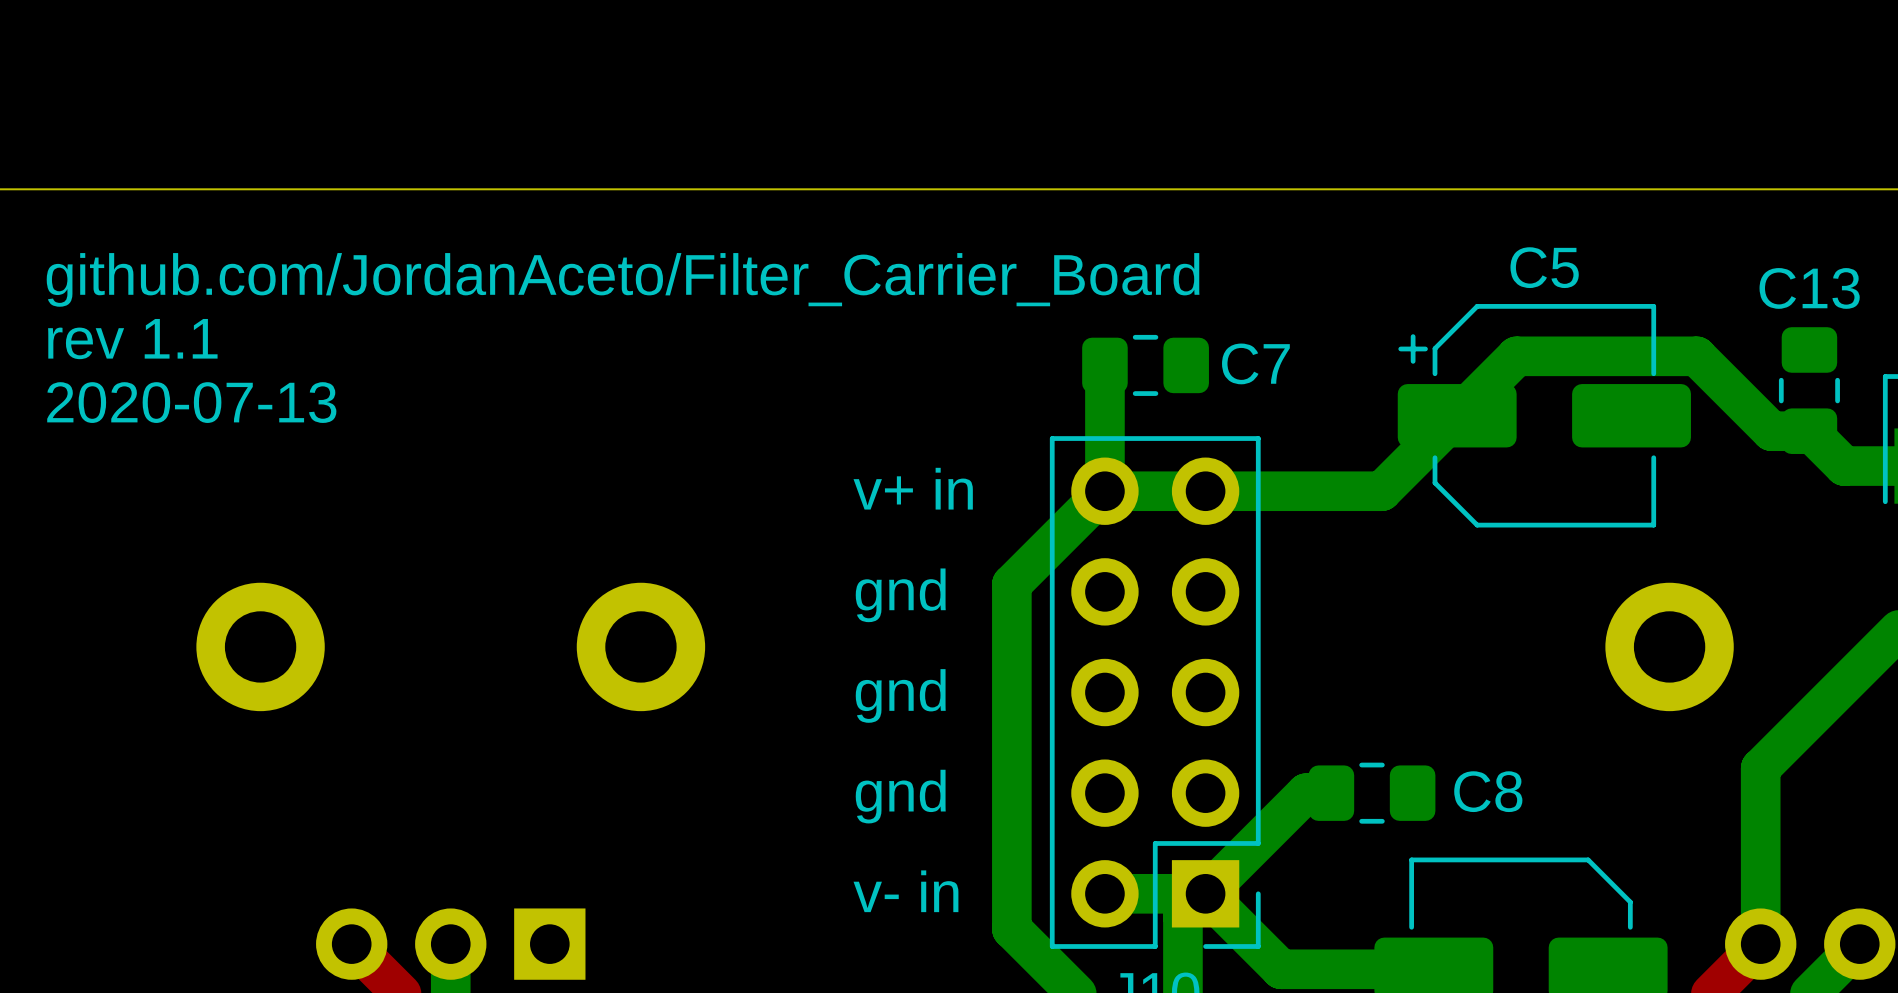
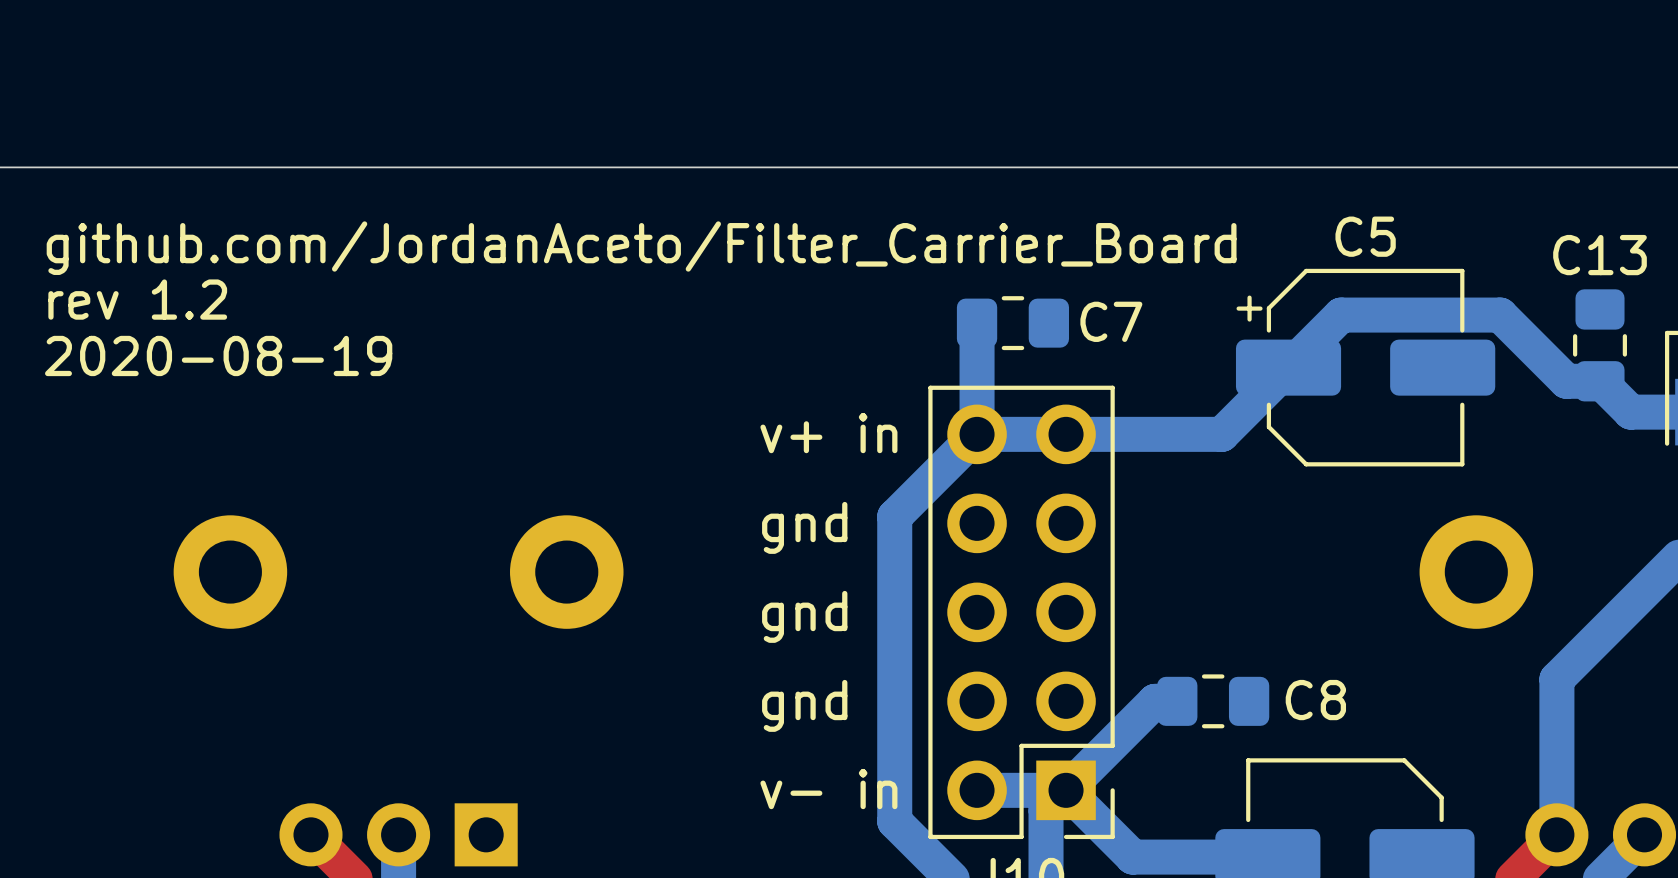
text: rev 1.1 (132, 339) -> rev 1.2 (137, 299)
text: 2020-07-13 (191, 402) -> 2020-08-19 (218, 355)

